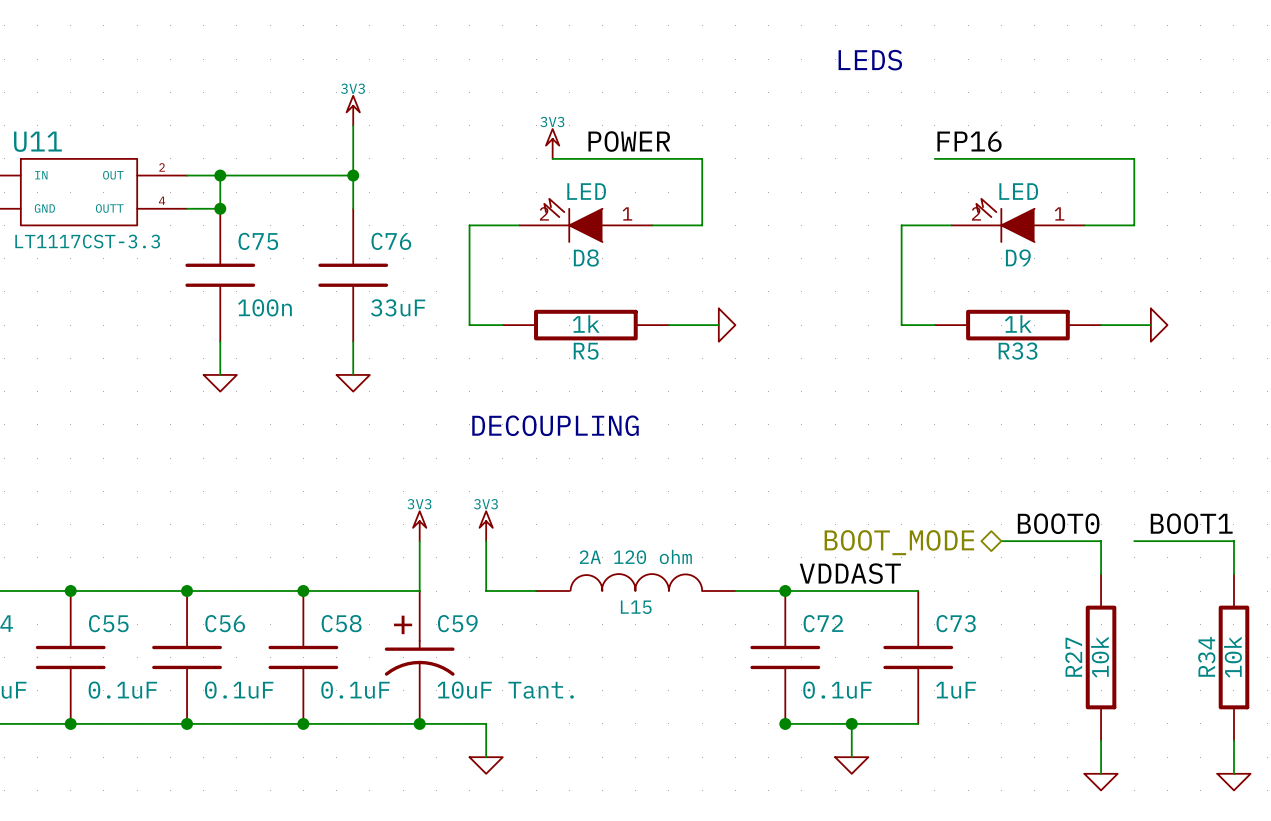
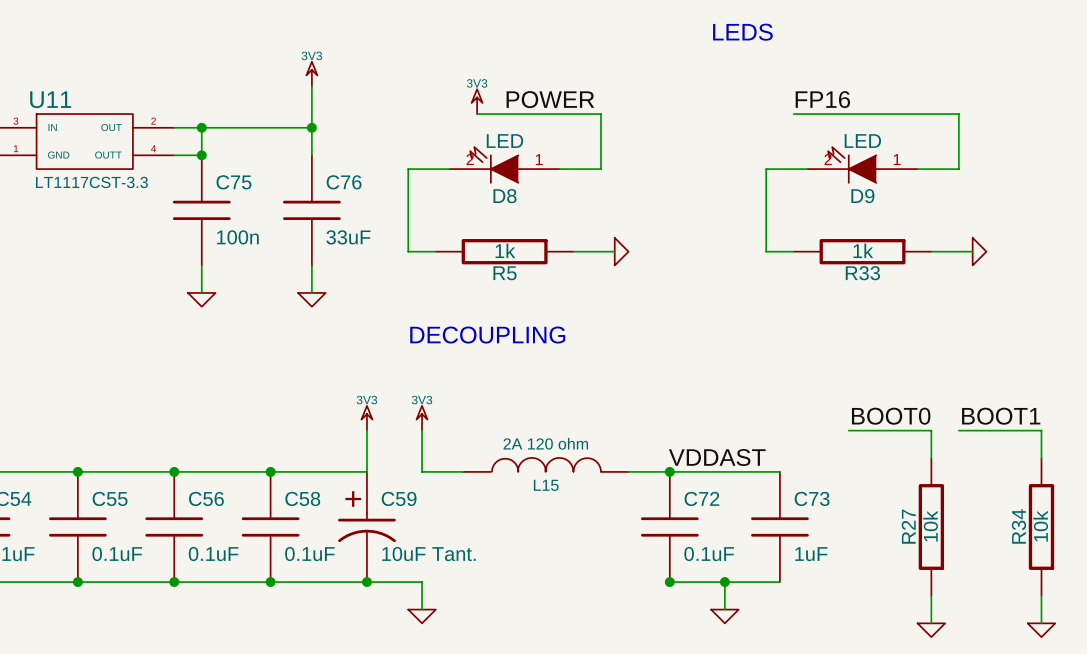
hierarchical label: BOOT_MODE (899, 542) -> none

